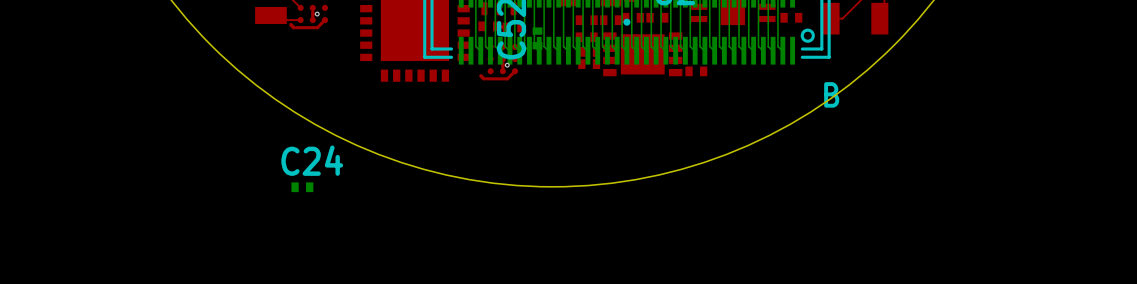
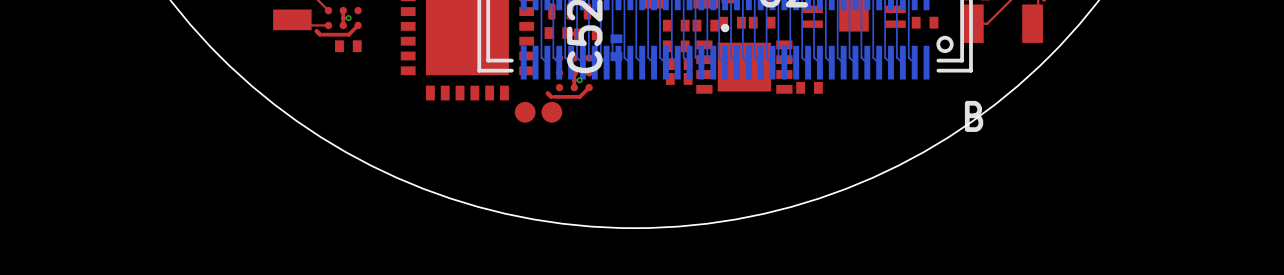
part: none -> (525, 112)
part: none -> (551, 112)
C24 side: bottom (302, 187) -> top (348, 46)

